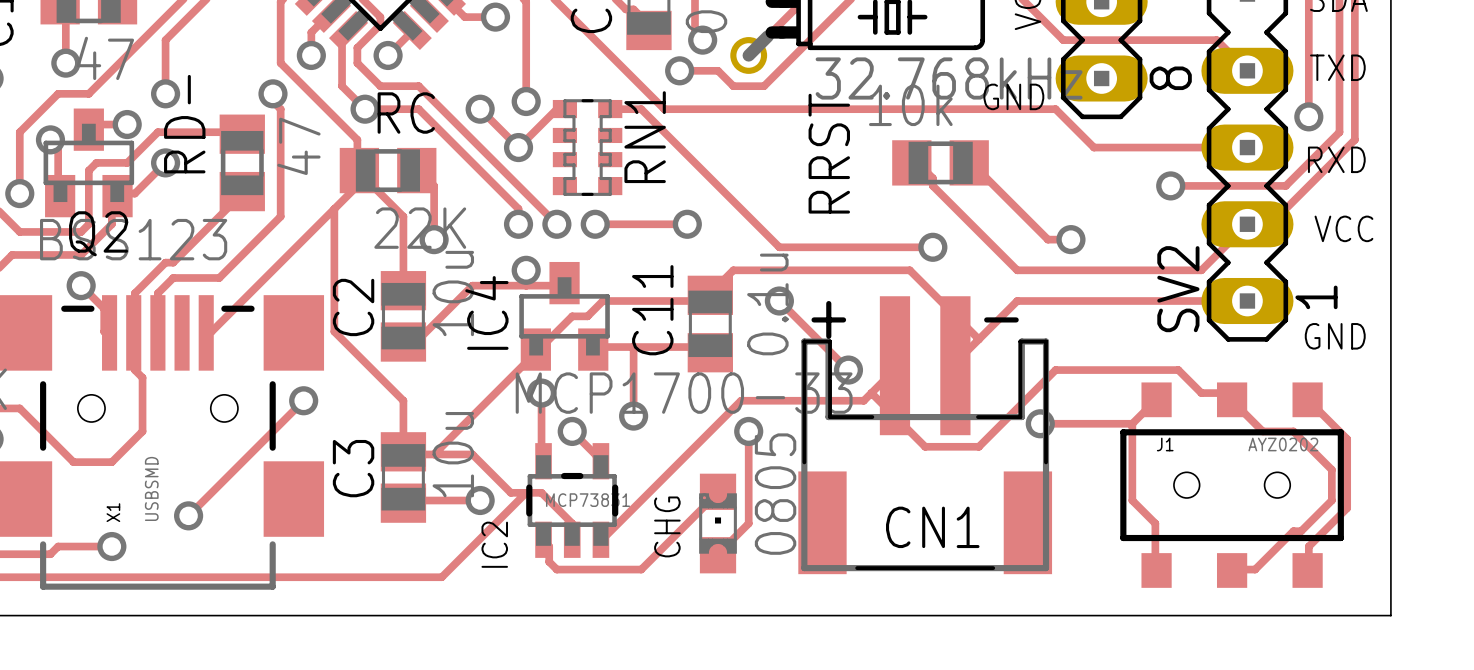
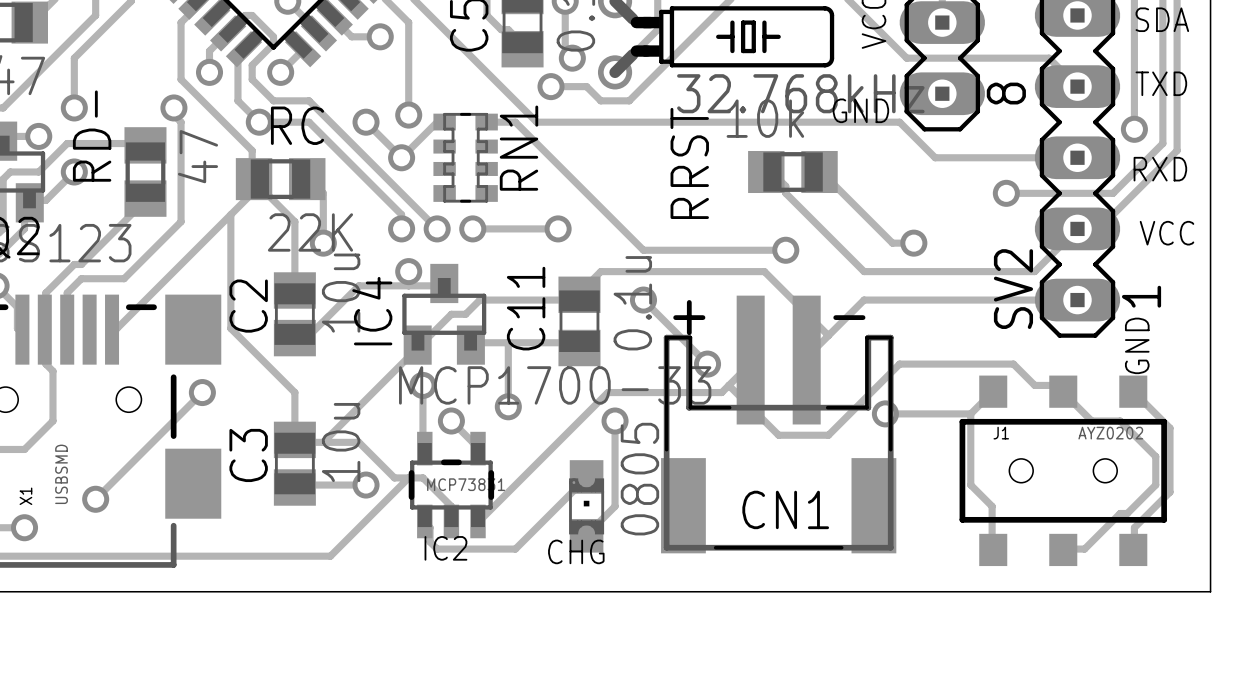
text rotation: 0° (1335, 336) -> 90° counterclockwise (1137, 345)
CHG name rotation: 0° (667, 526) -> 90° clockwise (576, 551)
IC2 name rotation: 0° (494, 544) -> 90° clockwise (445, 548)
IC2 name position: IC2 (494, 544) -> IC2 (445, 548)

